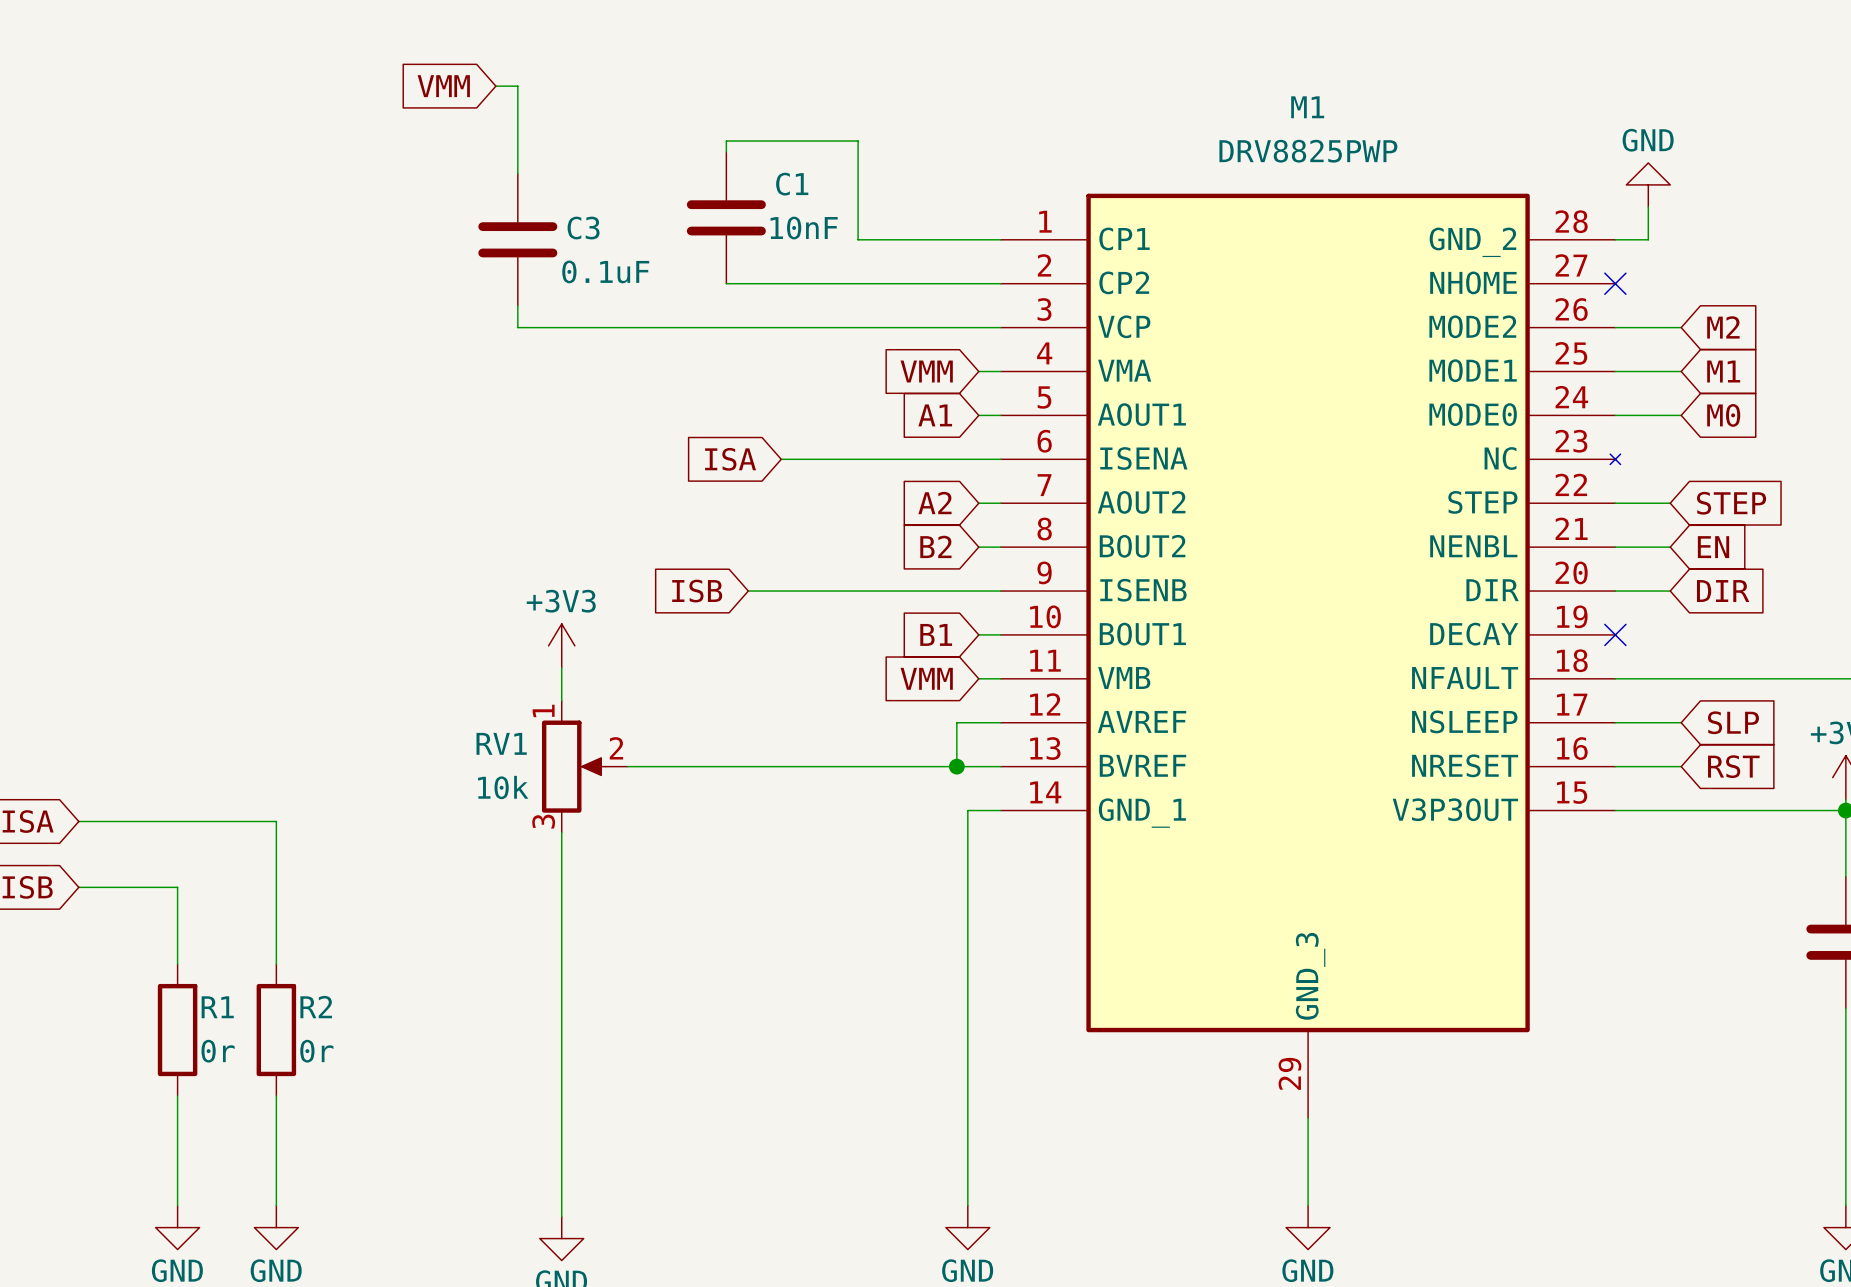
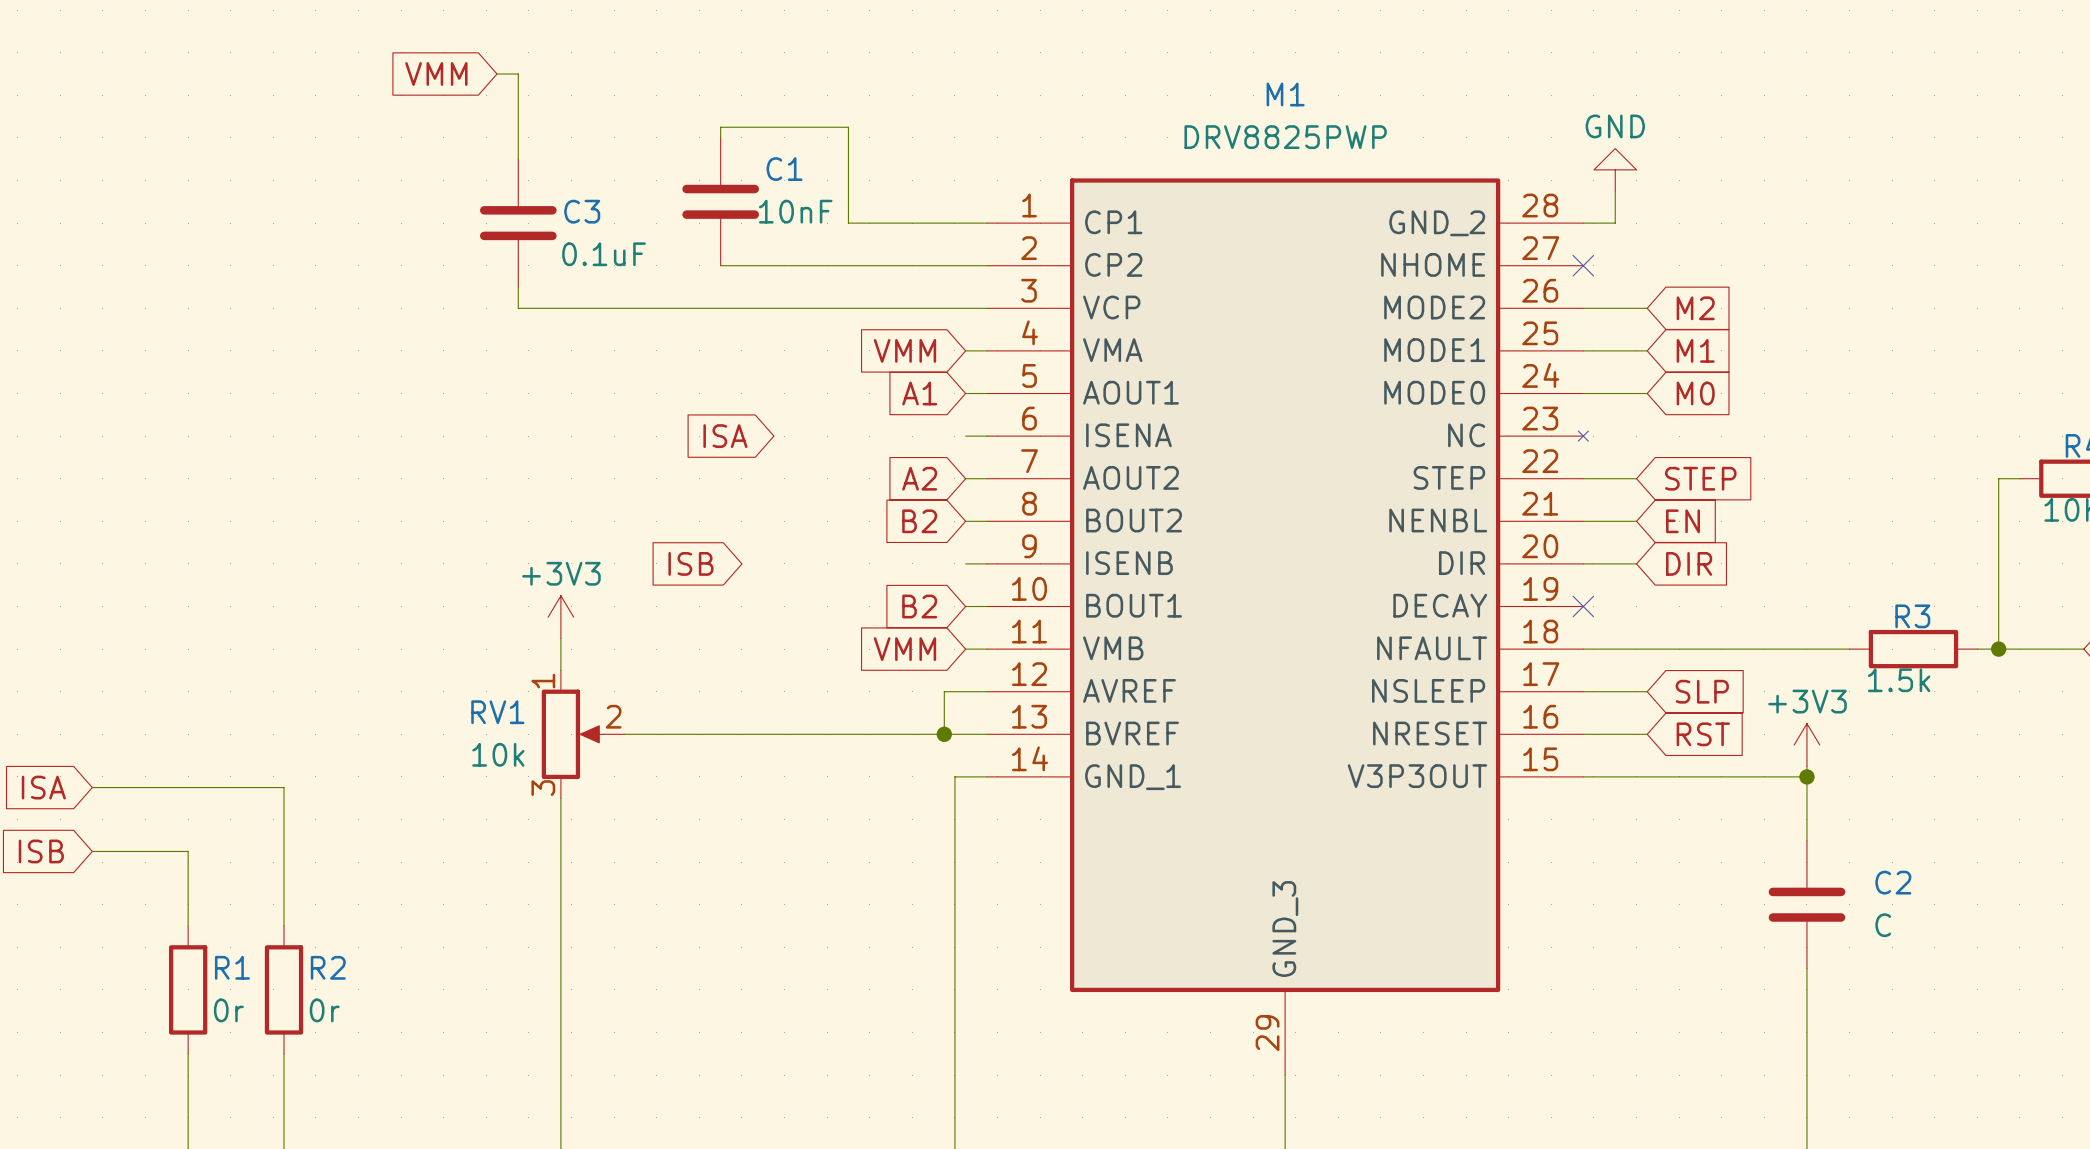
wire: (781, 459) (978, 459) -> none
wire: (748, 591) (978, 591) -> none
global label: B1 (936, 634) -> B2 (919, 606)

